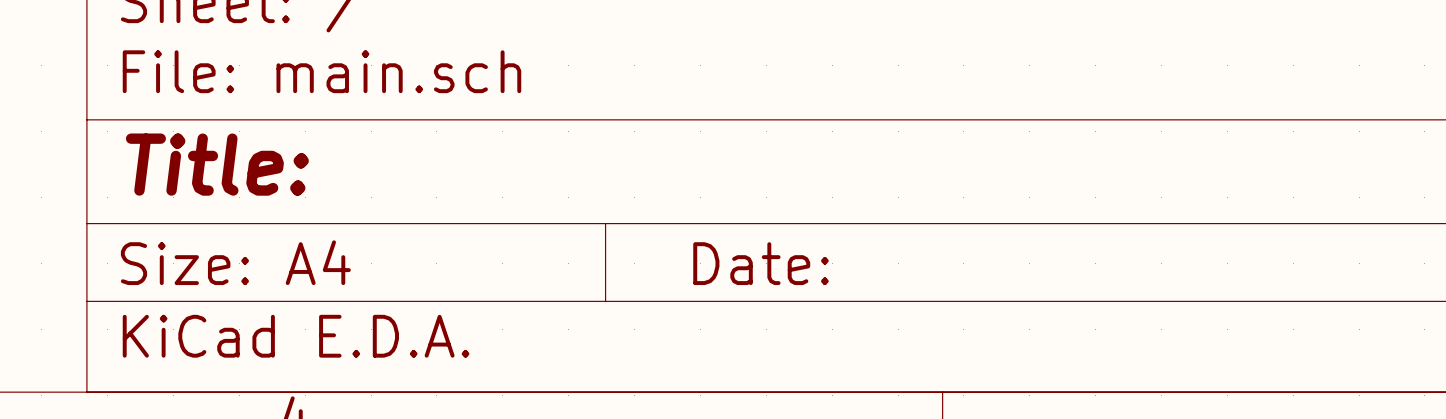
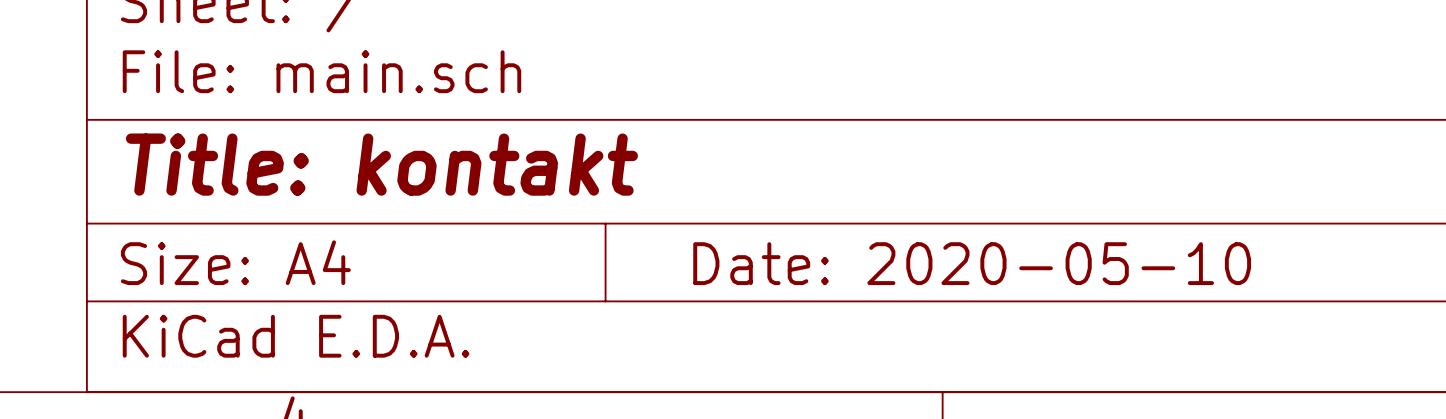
title block: Title: (217, 164) -> Title: kontakt (381, 164)
title block: Date: (760, 263) -> Date: 2020-05-10 (972, 263)

